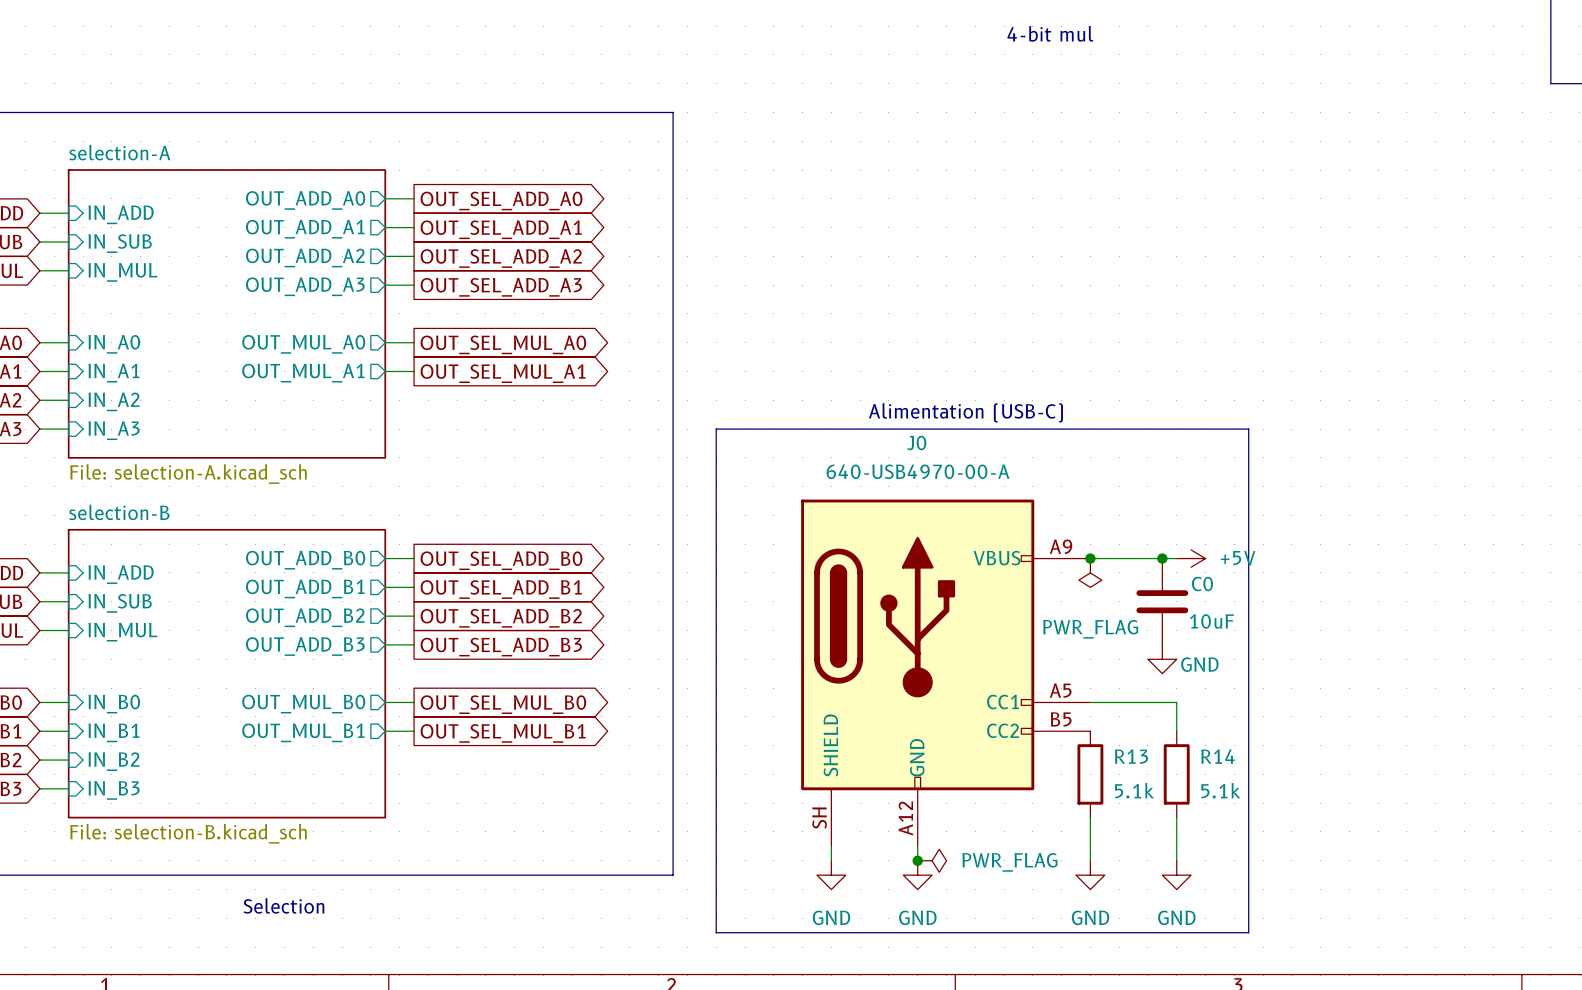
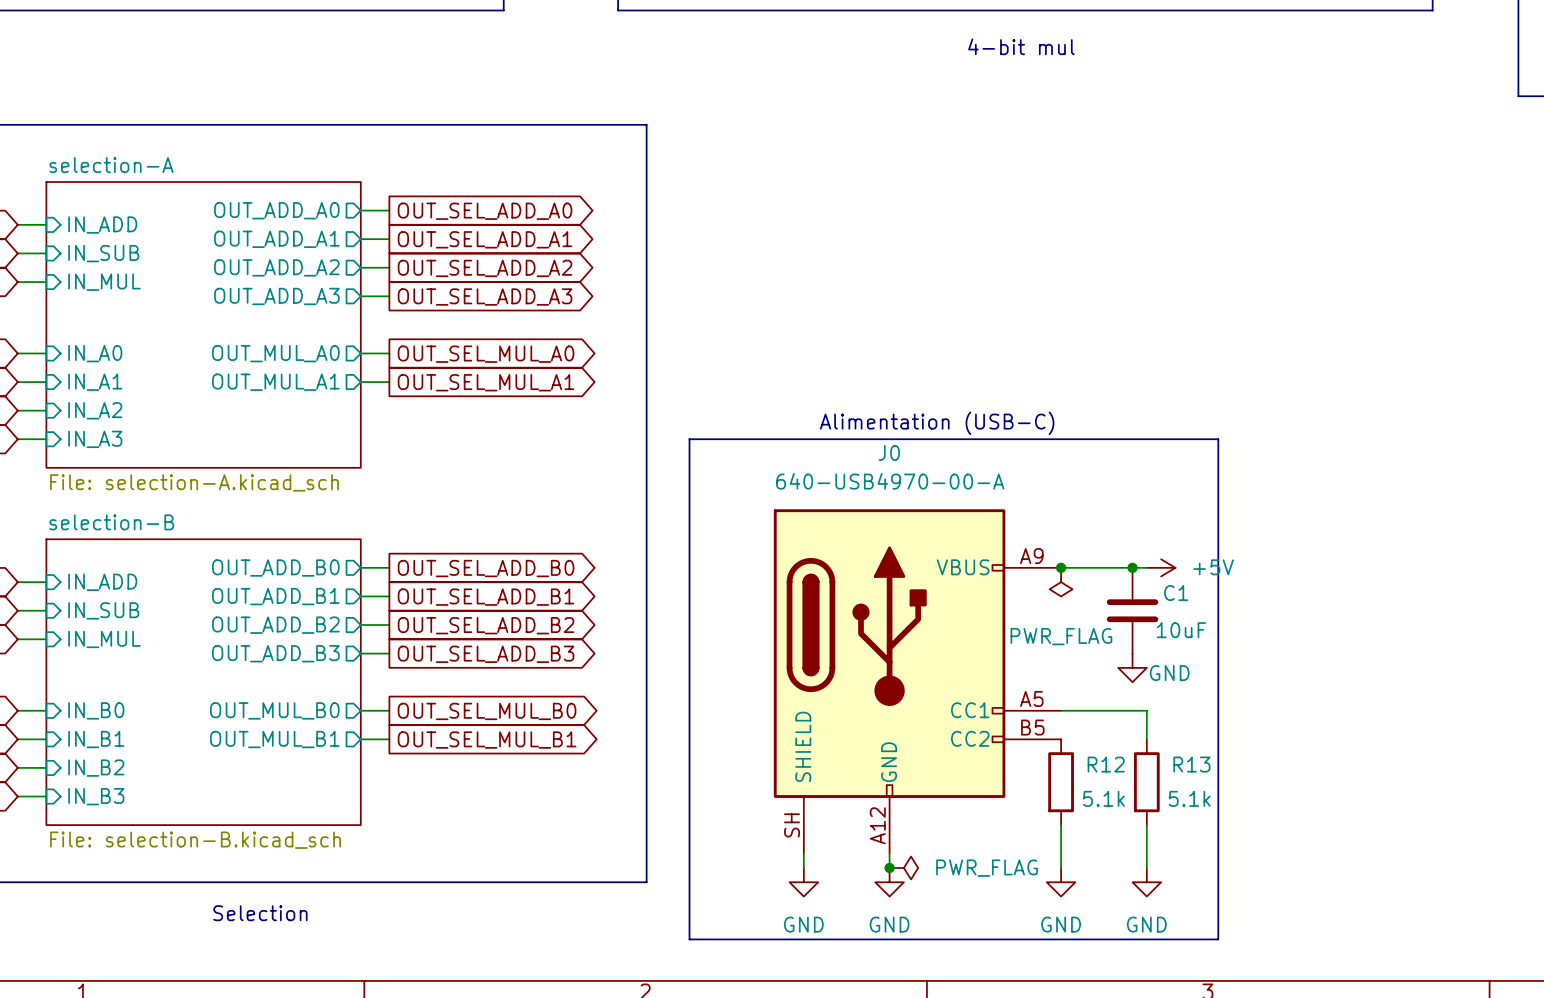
C0 name: C0 (1202, 584) -> C1 (1176, 593)
R13 name: R13 (1131, 756) -> R12 (1106, 764)
R14 name: R14 (1218, 756) -> R13 (1191, 764)

